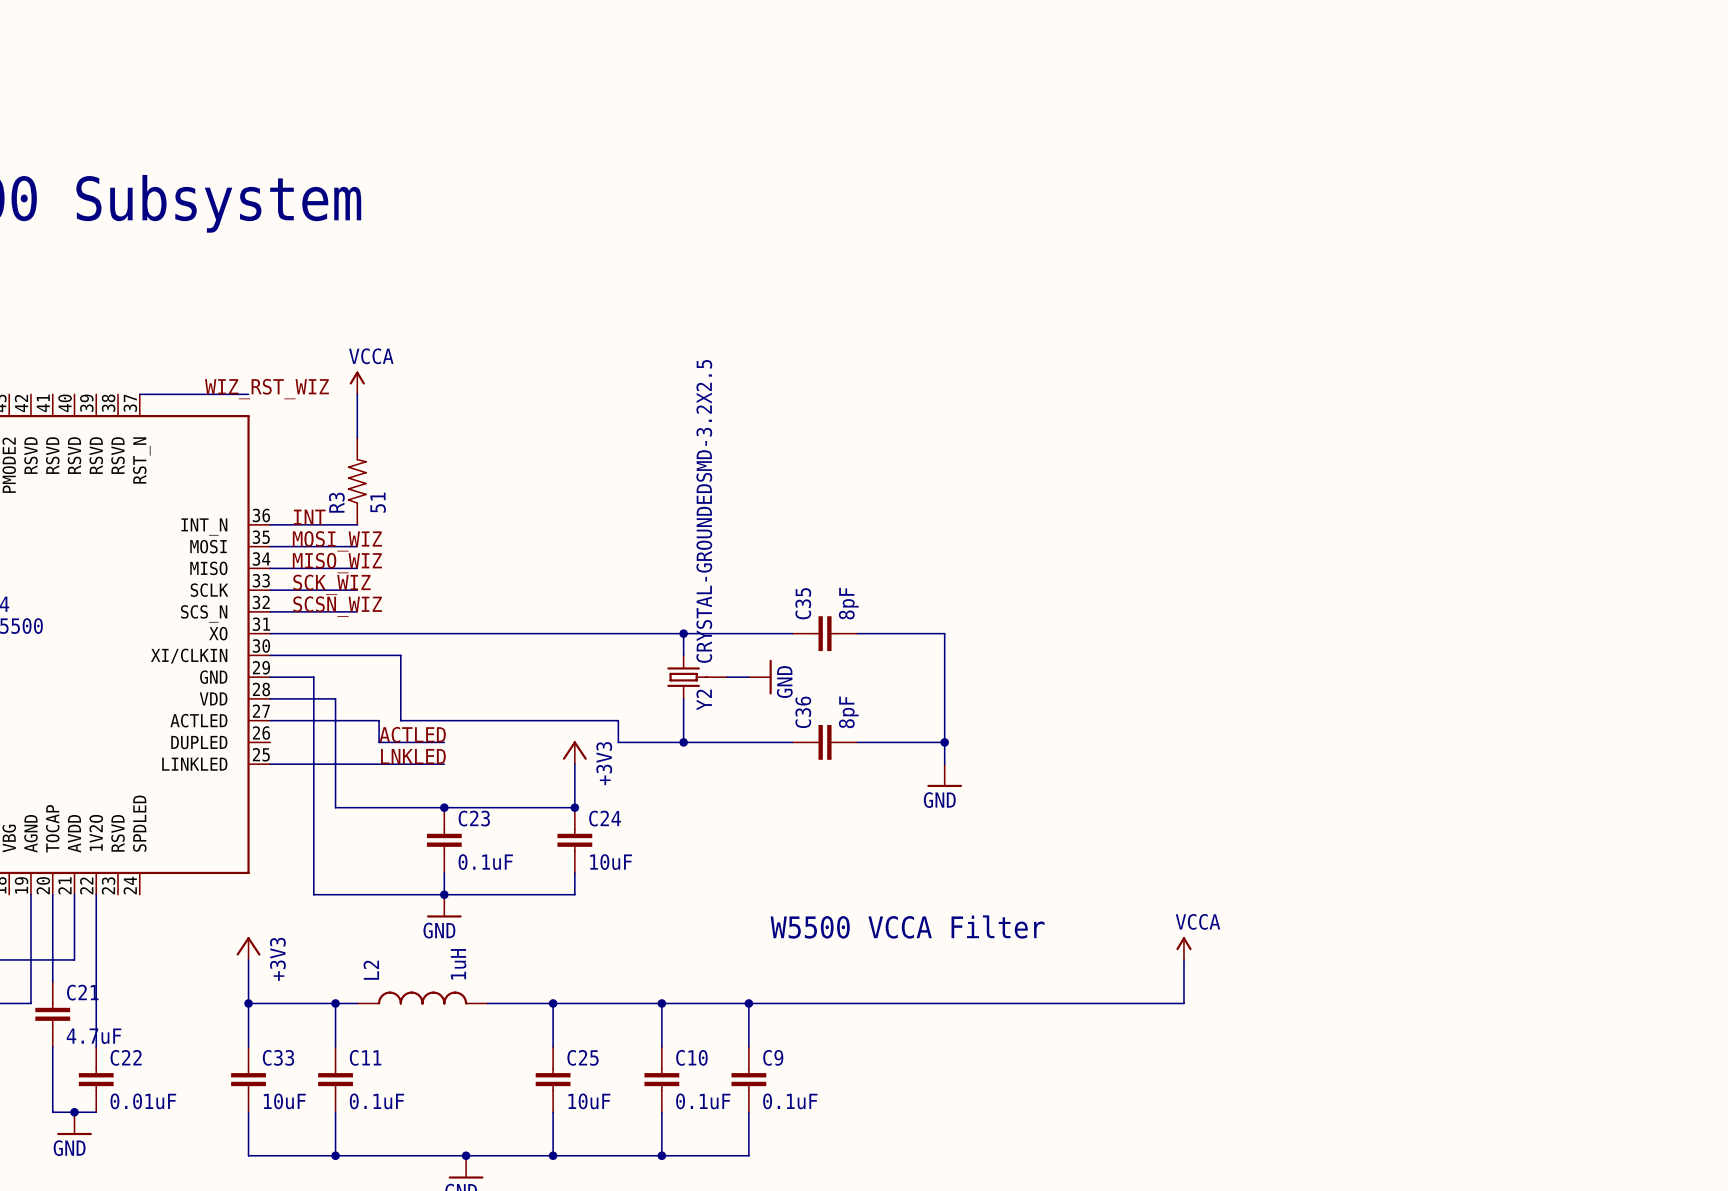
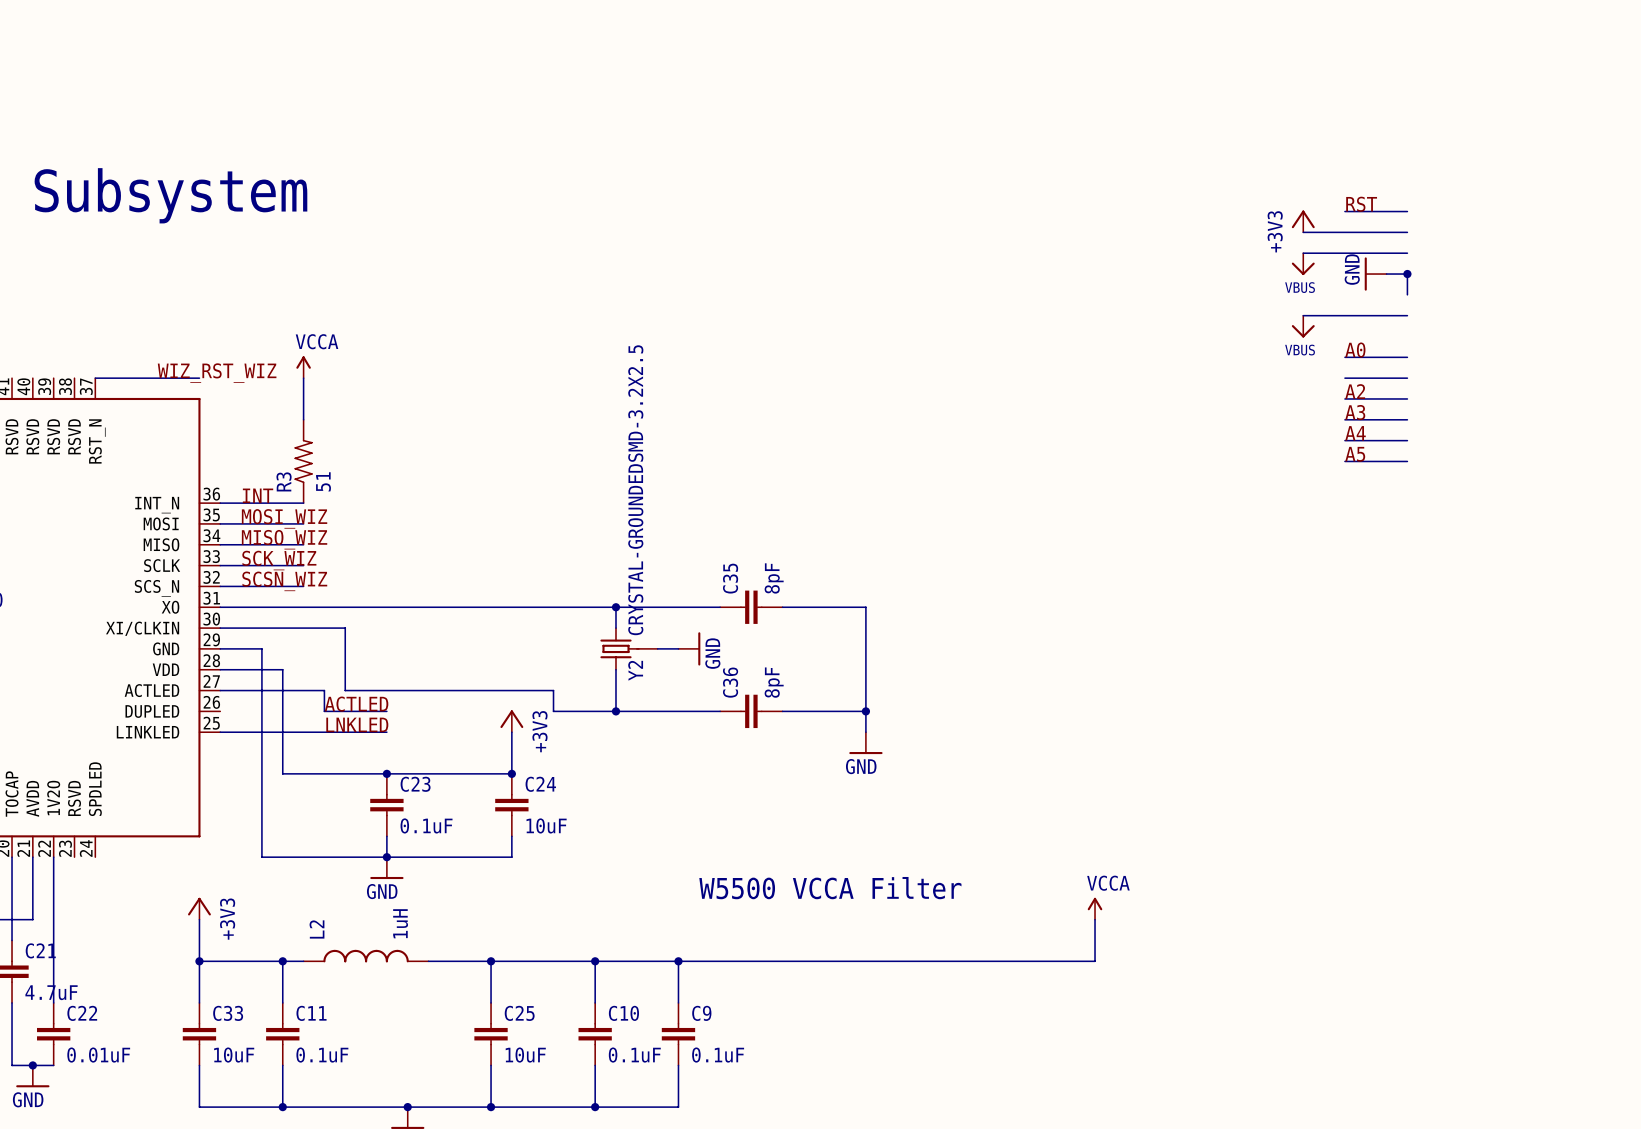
label: none -> RST (1361, 204)
wire: none -> (1344, 211) (1407, 211)
power symbol: none -> +3V3 (1303, 221)
wire: none -> (1303, 232) (1407, 232)
wire: none -> (1303, 253) (1407, 253)
power symbol: none -> VBUS (1303, 264)
power symbol: none -> GND (1375, 274)
wire: none -> (1386, 274) (1407, 274) (1407, 294)
junction: none -> (1407, 274)
wire: none -> (1303, 315) (1407, 315)
power symbol: none -> VBUS (1303, 326)
label: none -> A0 (1355, 350)
wire: none -> (1344, 357) (1407, 357)
wire: none -> (1344, 378) (1407, 378)
label: none -> A2 (1355, 391)
wire: none -> (1344, 398) (1407, 398)
label: none -> A3 (1355, 412)
wire: none -> (1344, 419) (1407, 419)
label: none -> A4 (1355, 433)
wire: none -> (1344, 440) (1407, 440)
label: none -> A5 (1355, 454)
wire: none -> (1344, 461) (1407, 461)

